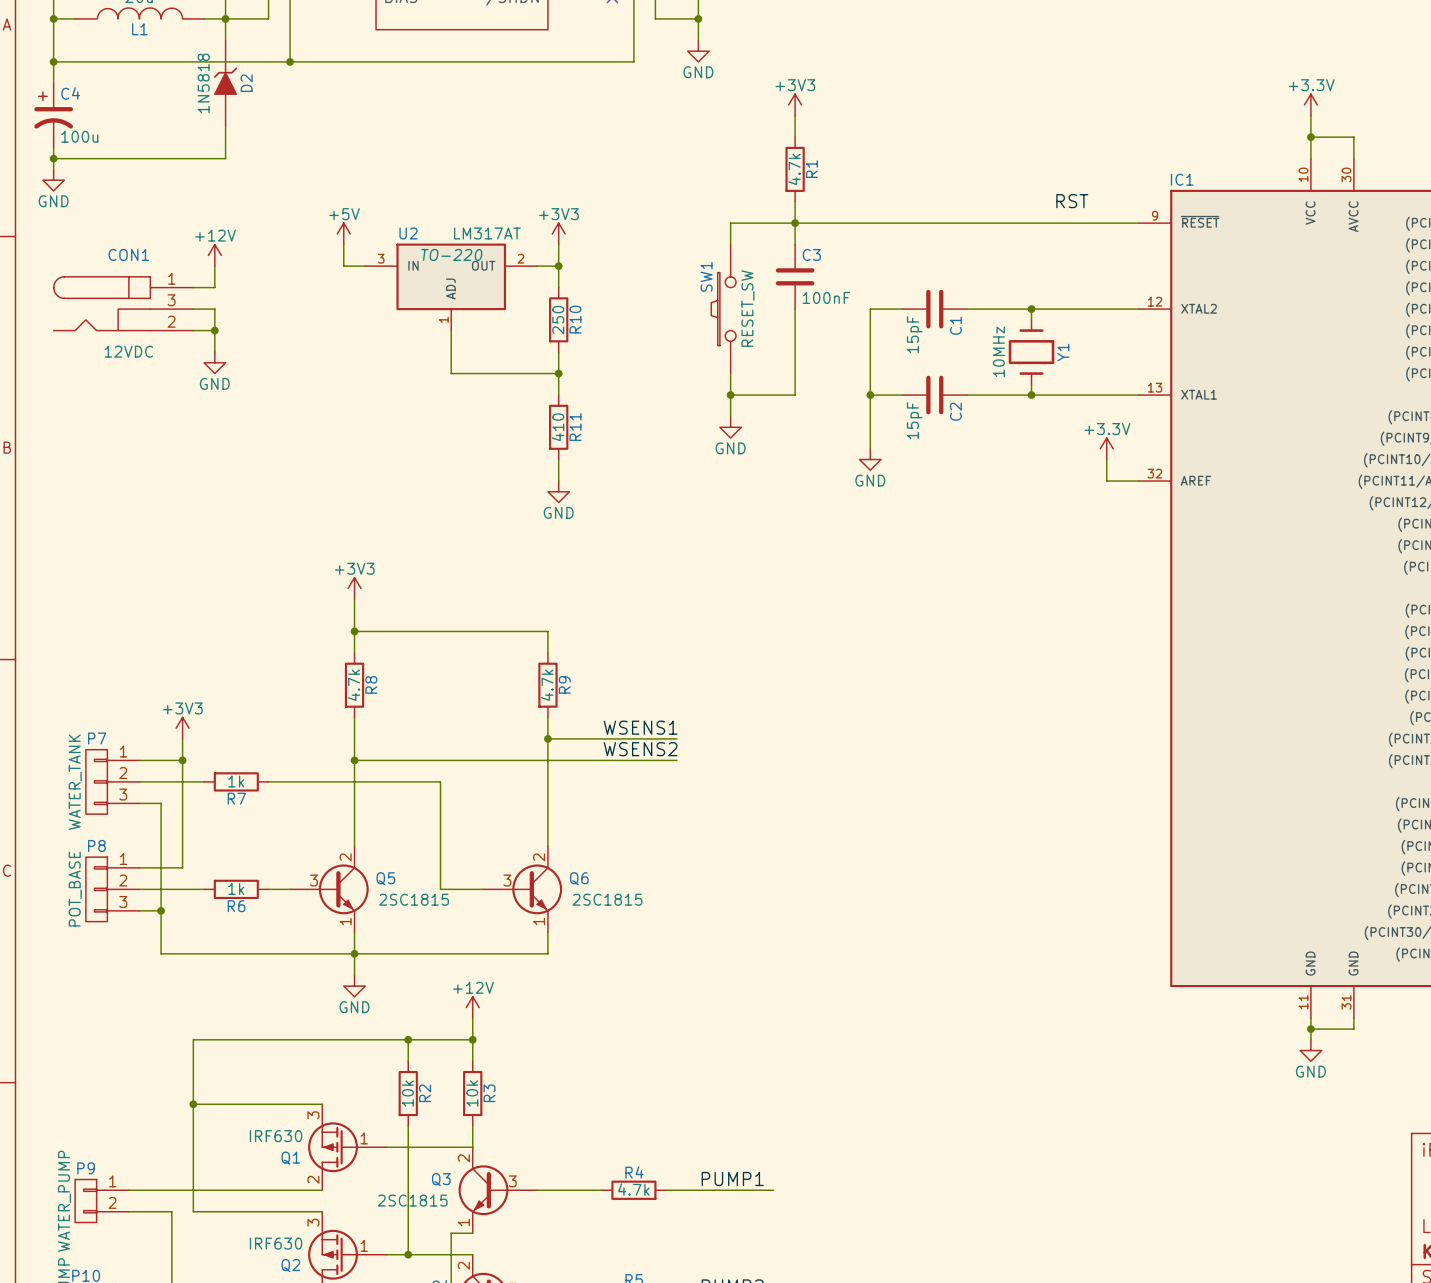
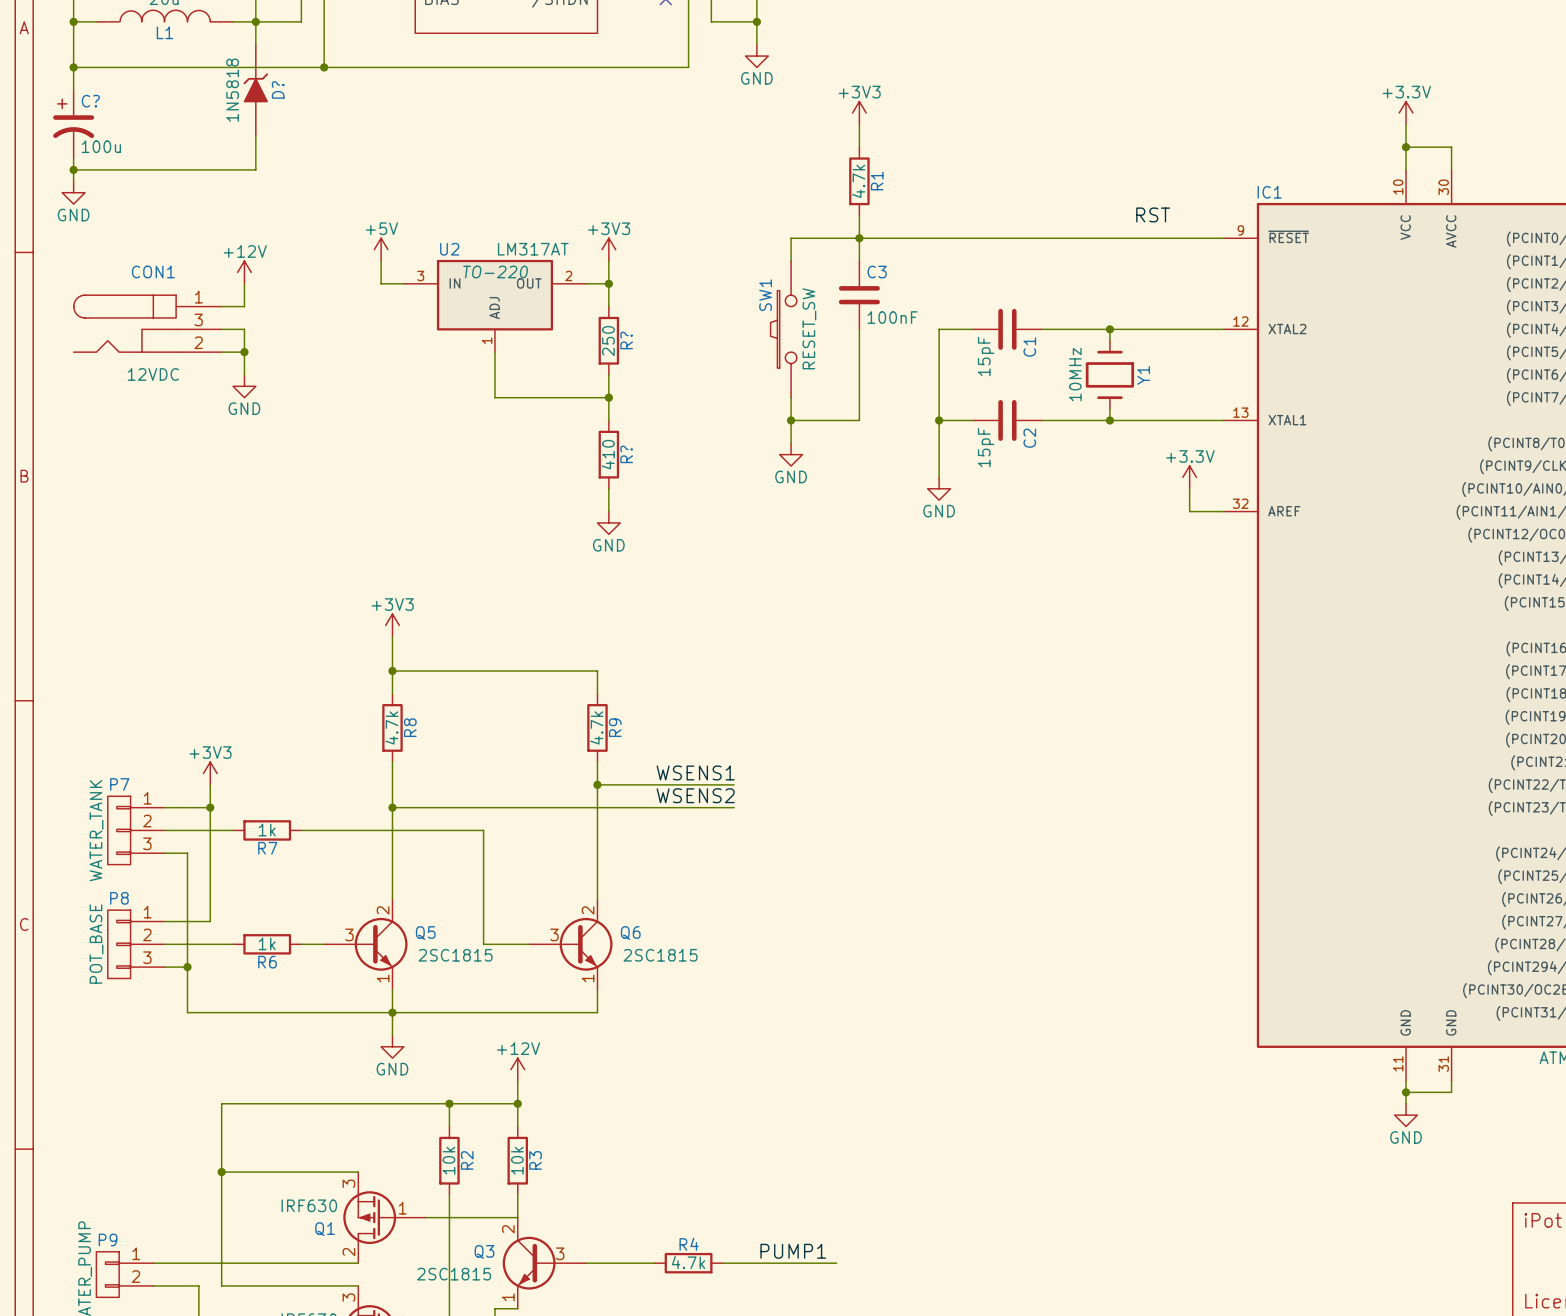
D2 name: D2 (246, 83) -> D? (278, 89)
C4 name: C4 (70, 93) -> C? (90, 101)
R10 name: R10 (575, 319) -> R? (626, 340)
R11 name: R11 (575, 427) -> R? (626, 454)

